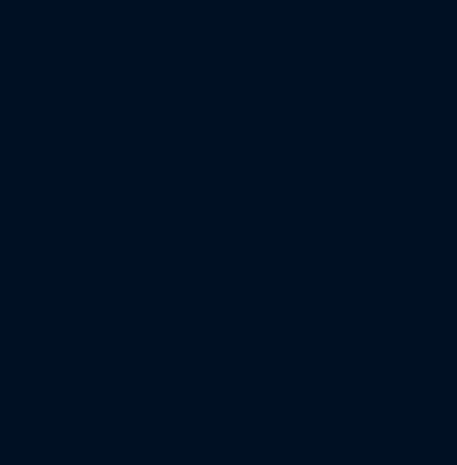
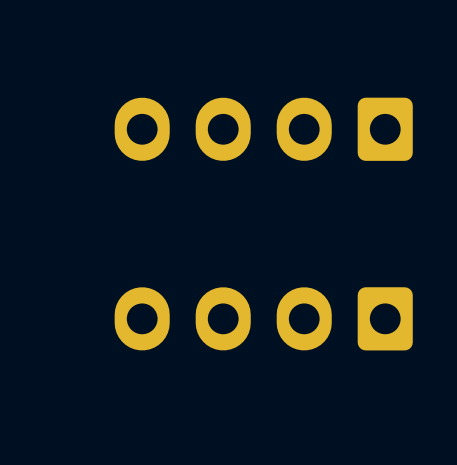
part: none -> (263, 129)
part: none -> (263, 318)

